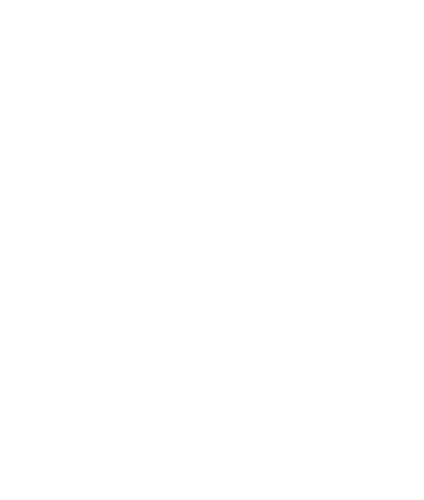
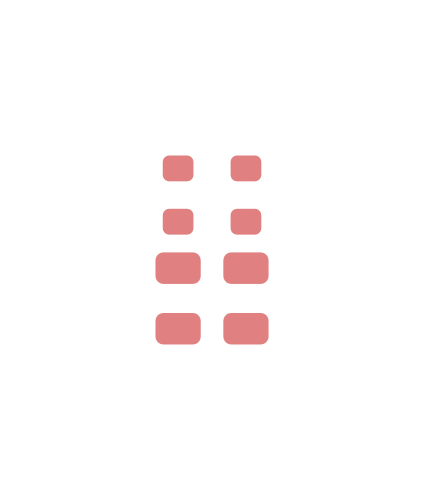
part: none -> (178, 195)
part: none -> (245, 195)
part: none -> (178, 298)
part: none -> (245, 298)

